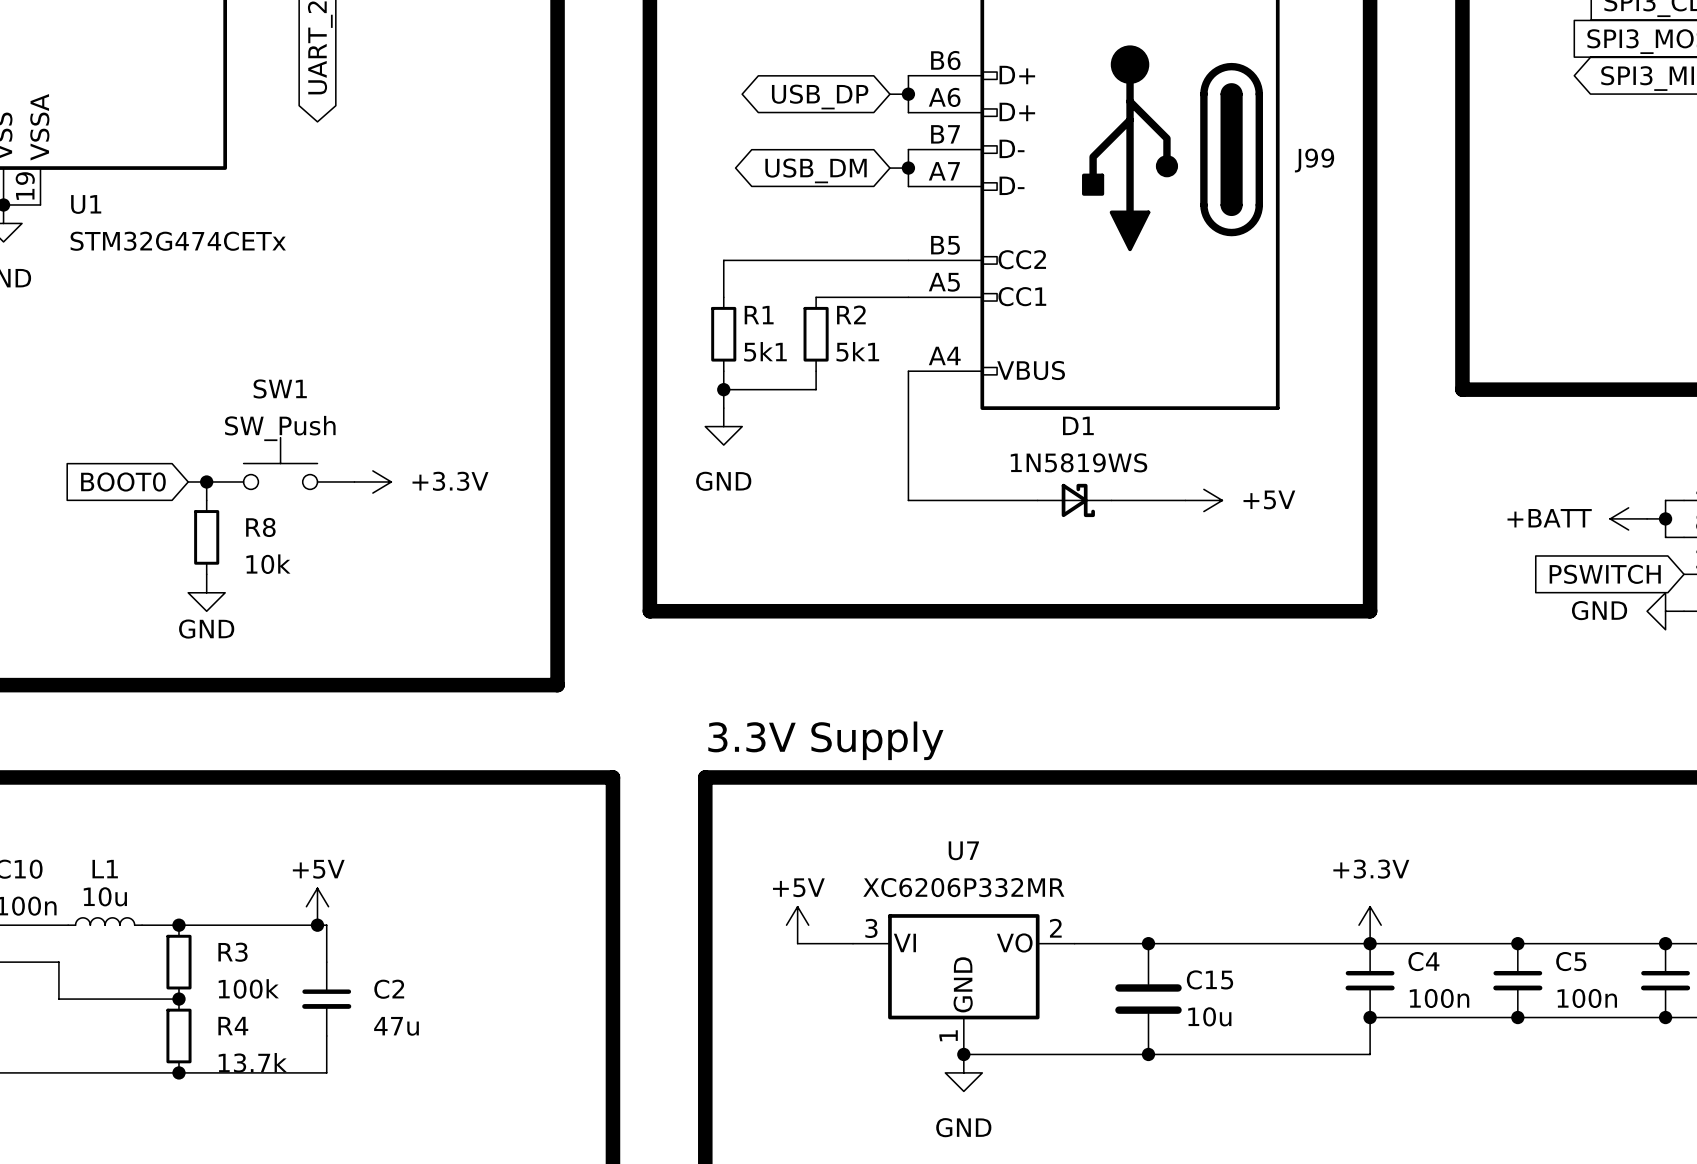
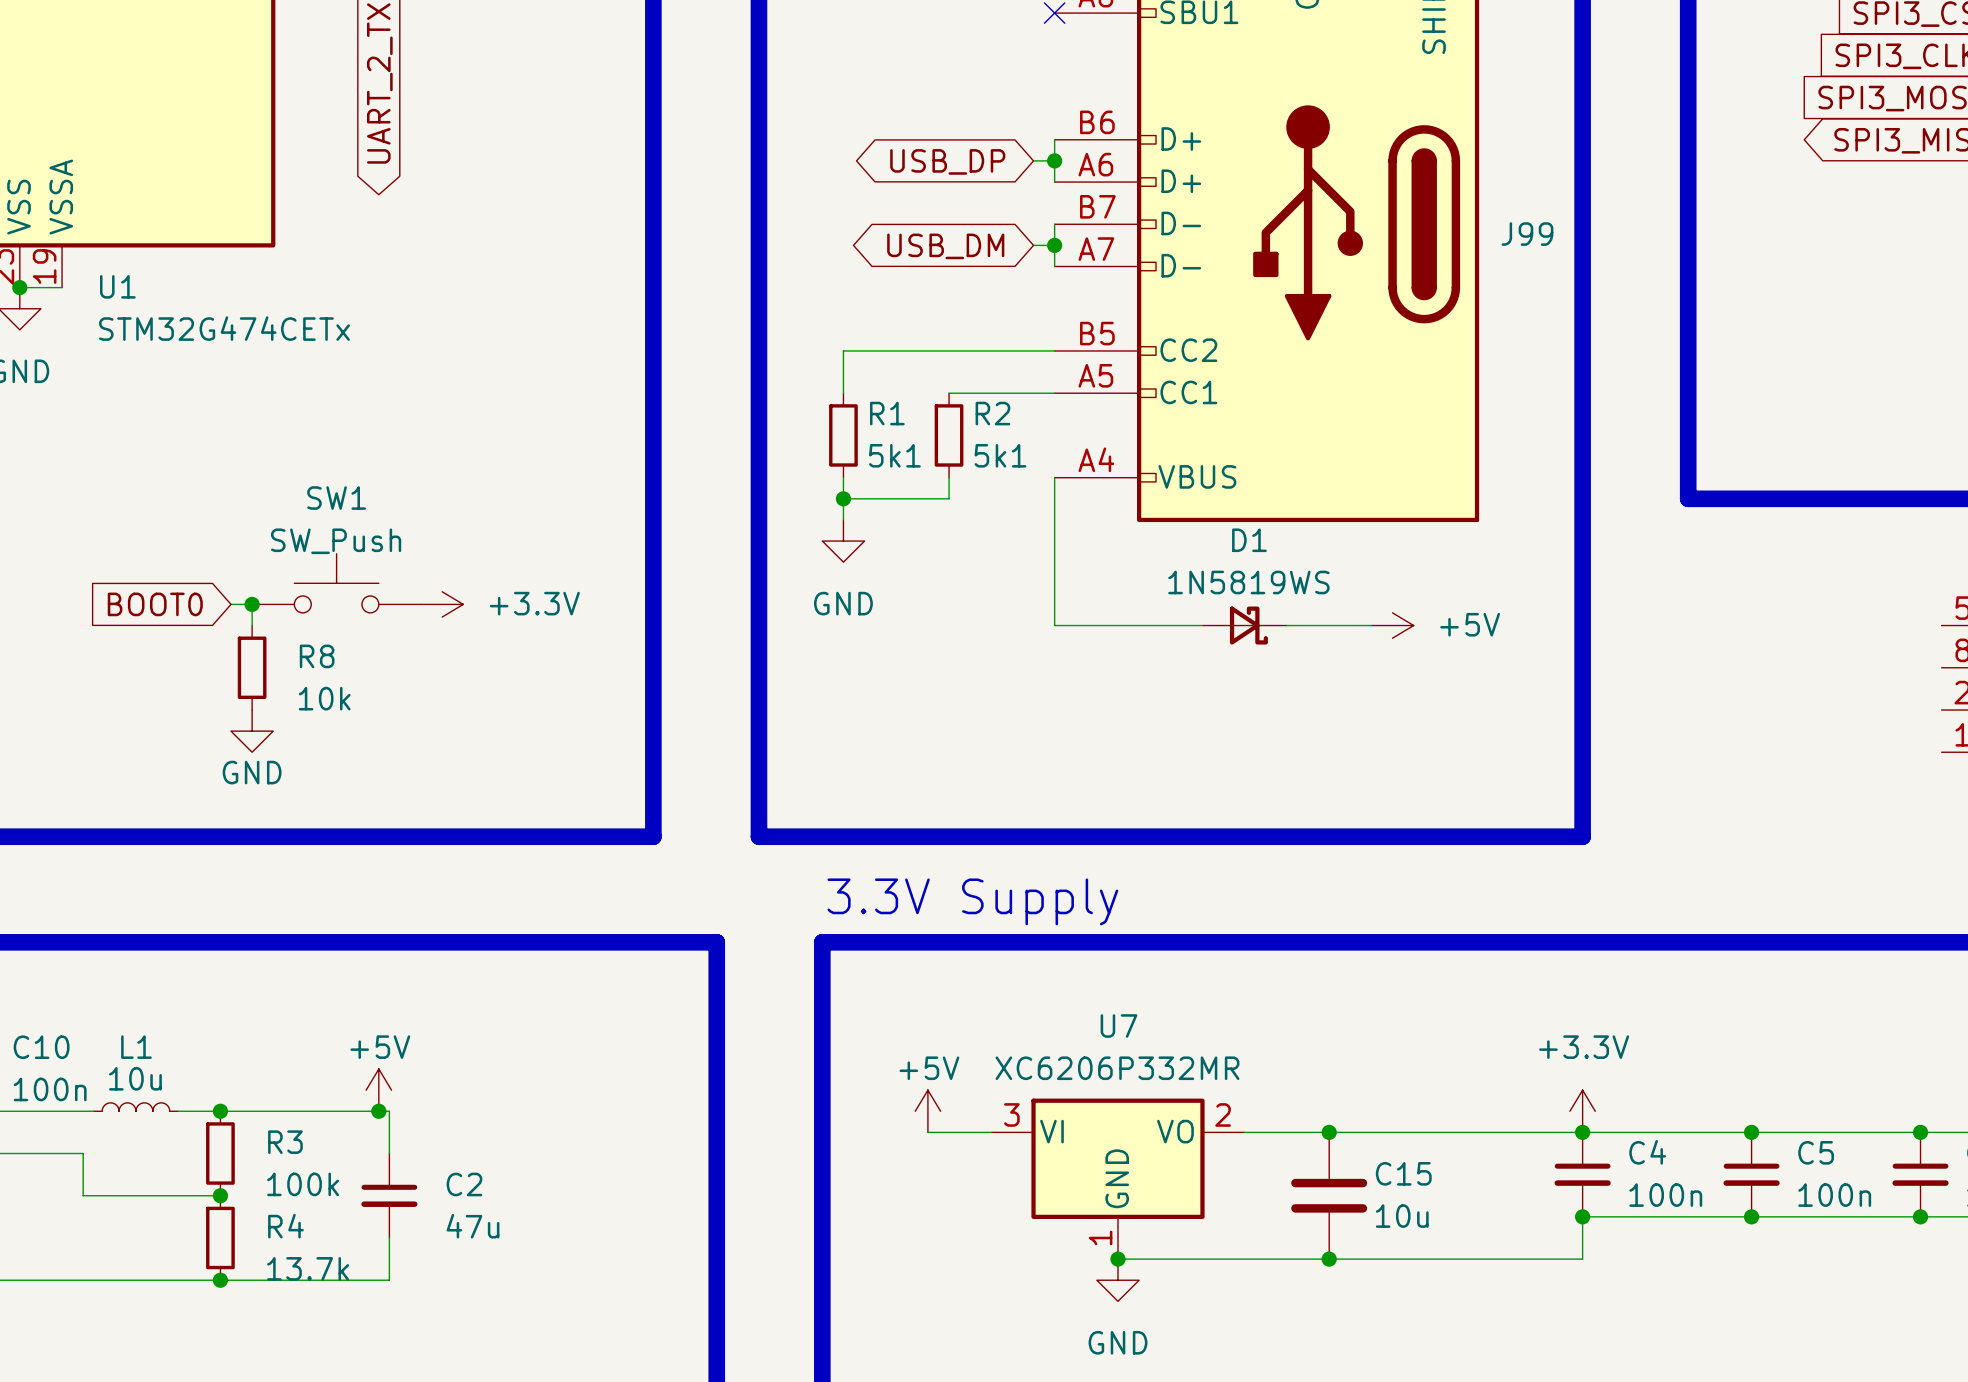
wire: (1684, 500) (1665, 500) (1665, 537) (1684, 537) -> none
power symbol: +BATT (1628, 518) -> none
wire: (1647, 518) (1665, 518) -> none
junction: (1665, 518) -> none
global label: PSWITCH (1605, 574) -> none
line: (649, 611) (1370, 611) -> (758, 752) (758, 836) (1582, 836) (1582, 752)
power symbol: GND (1665, 611) -> none

